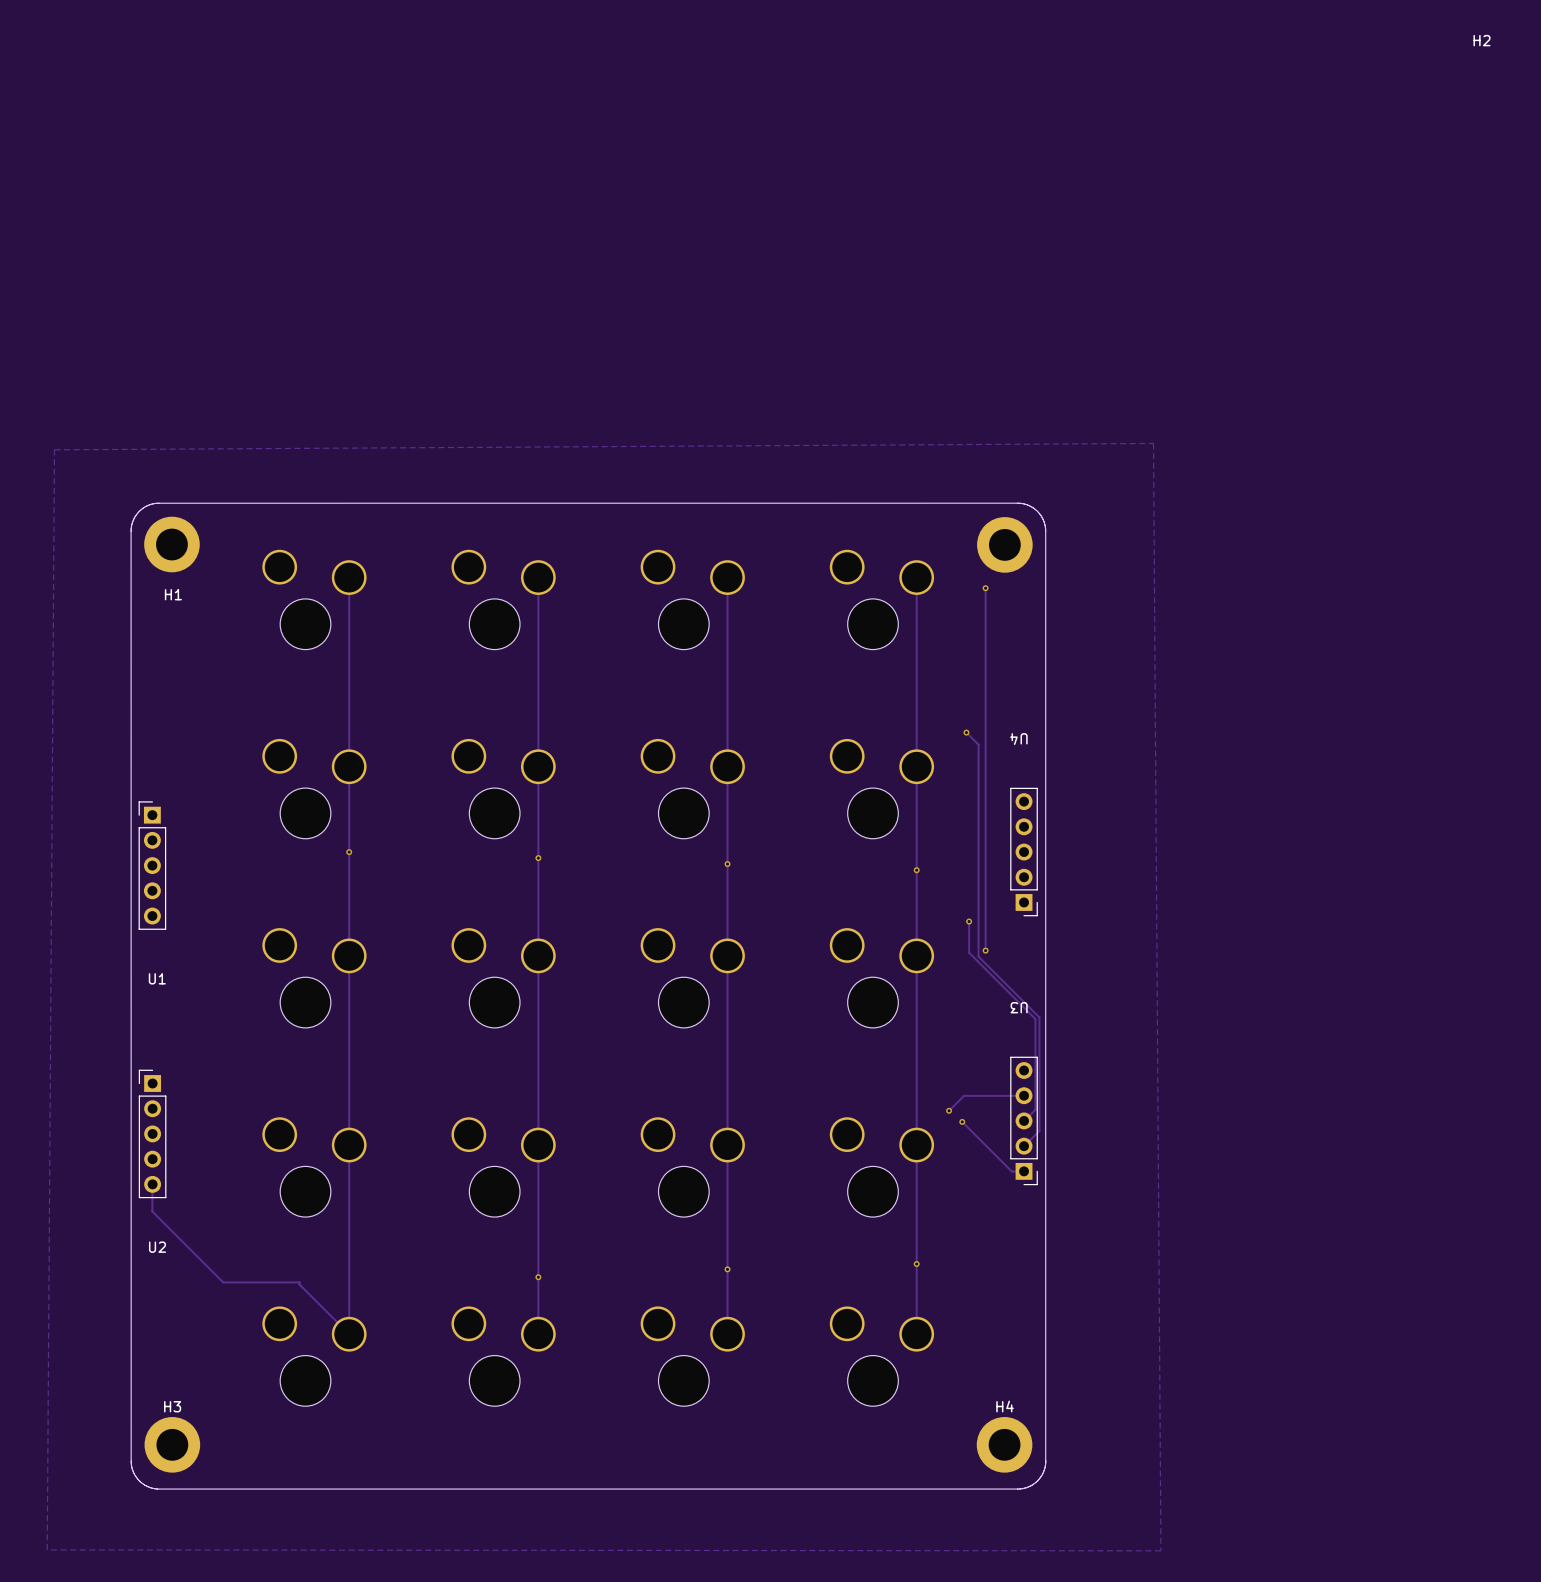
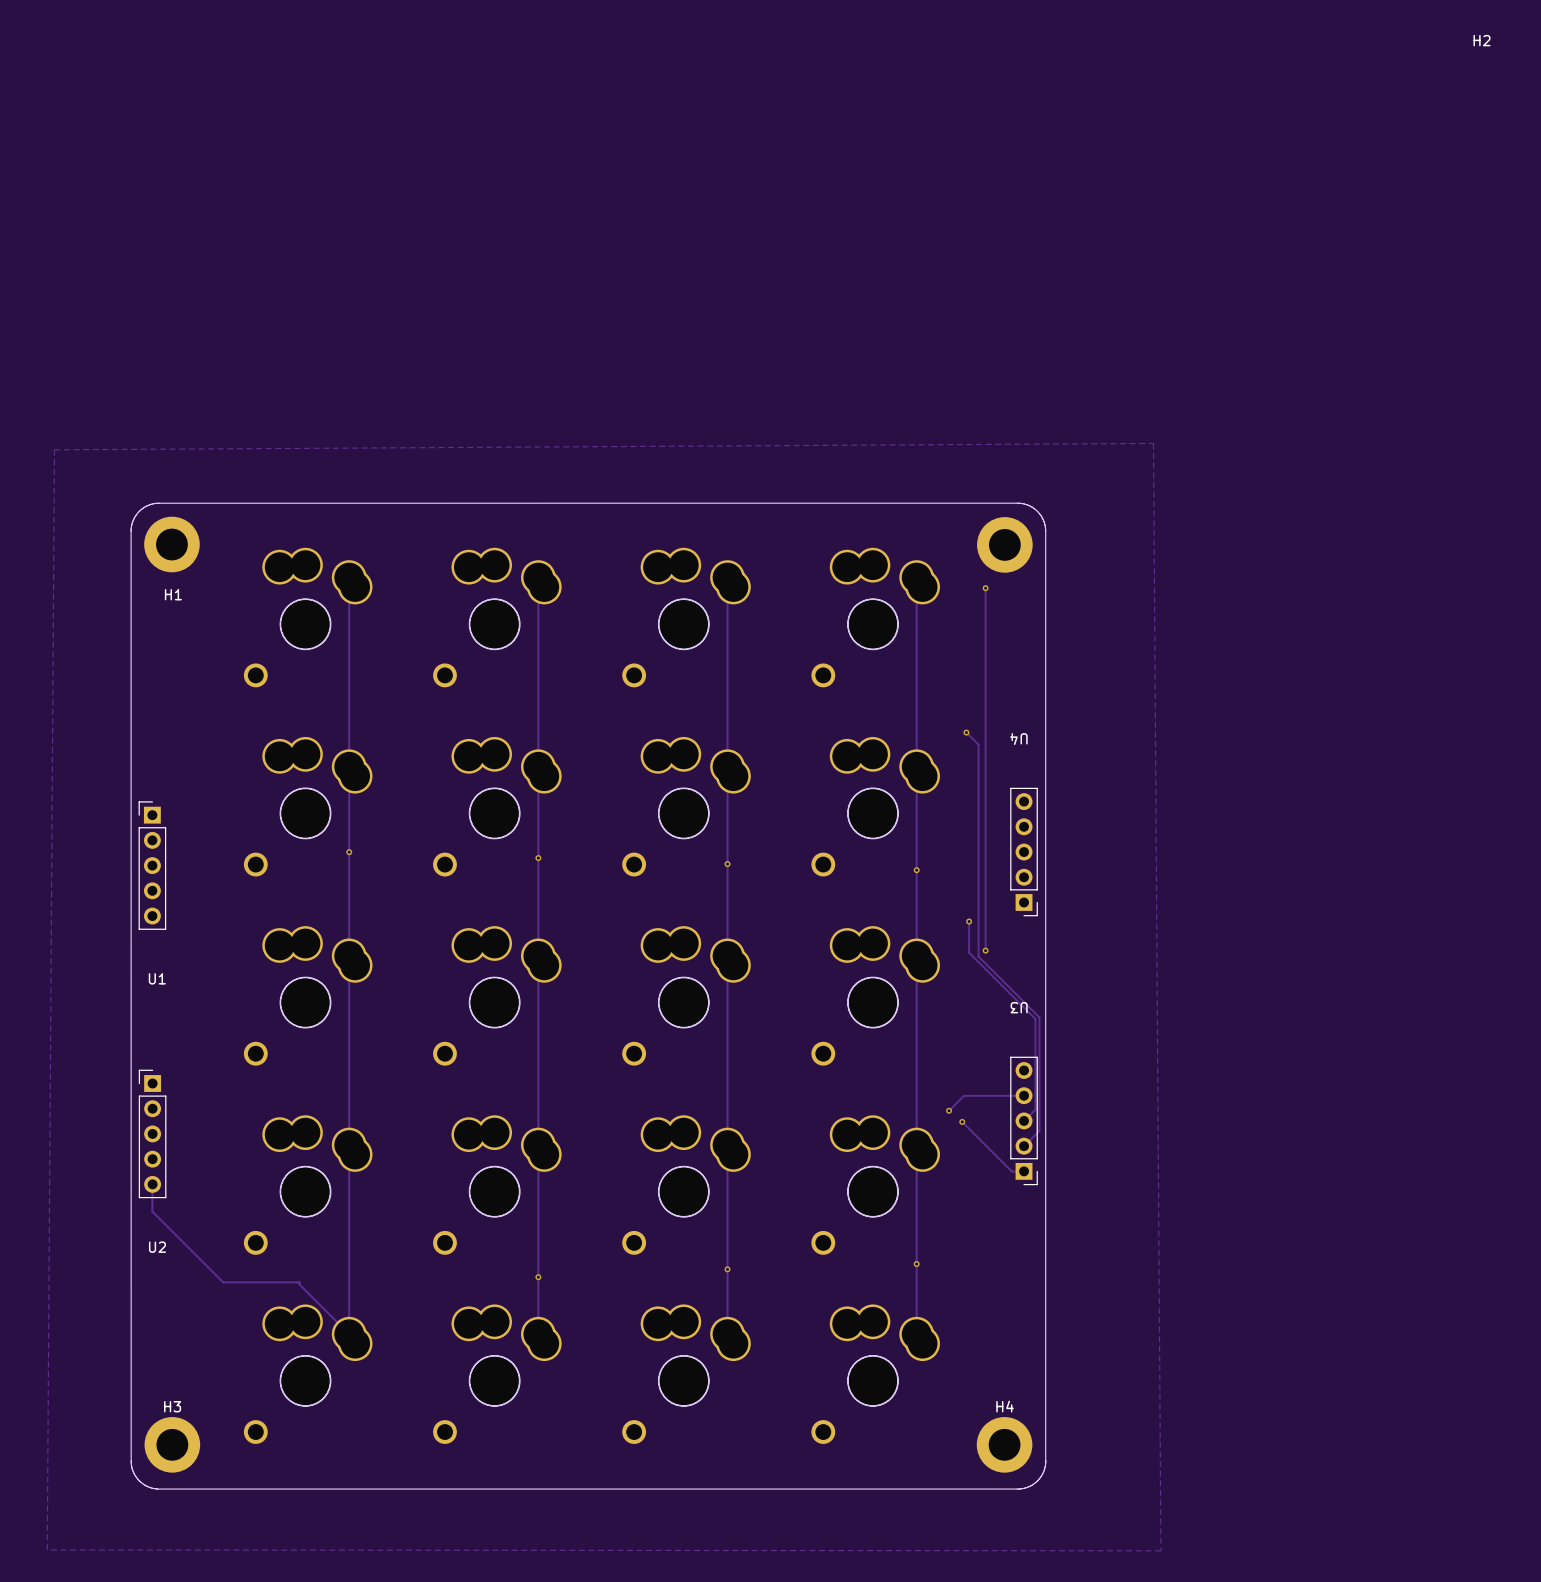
part: (314, 599) -> none
part: (503, 599) -> none
part: (692, 599) -> none
part: (881, 599) -> none
part: none -> (308, 617)
part: none -> (497, 617)
part: none -> (686, 617)
part: none -> (875, 617)
part: (314, 788) -> none
part: (503, 788) -> none
part: (692, 788) -> none
part: (881, 788) -> none
part: none -> (308, 806)
part: none -> (497, 806)
part: none -> (686, 806)
part: none -> (875, 806)
part: (314, 977) -> none
part: (503, 977) -> none
part: (692, 977) -> none
part: (881, 977) -> none
part: none -> (308, 995)
part: none -> (497, 995)
part: none -> (686, 995)
part: none -> (875, 995)
part: (314, 1167) -> none
part: (503, 1167) -> none
part: (692, 1167) -> none
part: (881, 1167) -> none
part: none -> (308, 1185)
part: none -> (497, 1185)
part: none -> (686, 1185)
part: none -> (875, 1185)
part: (314, 1356) -> none
part: (503, 1356) -> none
part: (692, 1356) -> none
part: (881, 1356) -> none
part: none -> (308, 1374)
part: none -> (497, 1374)
part: none -> (686, 1374)
part: none -> (875, 1374)

